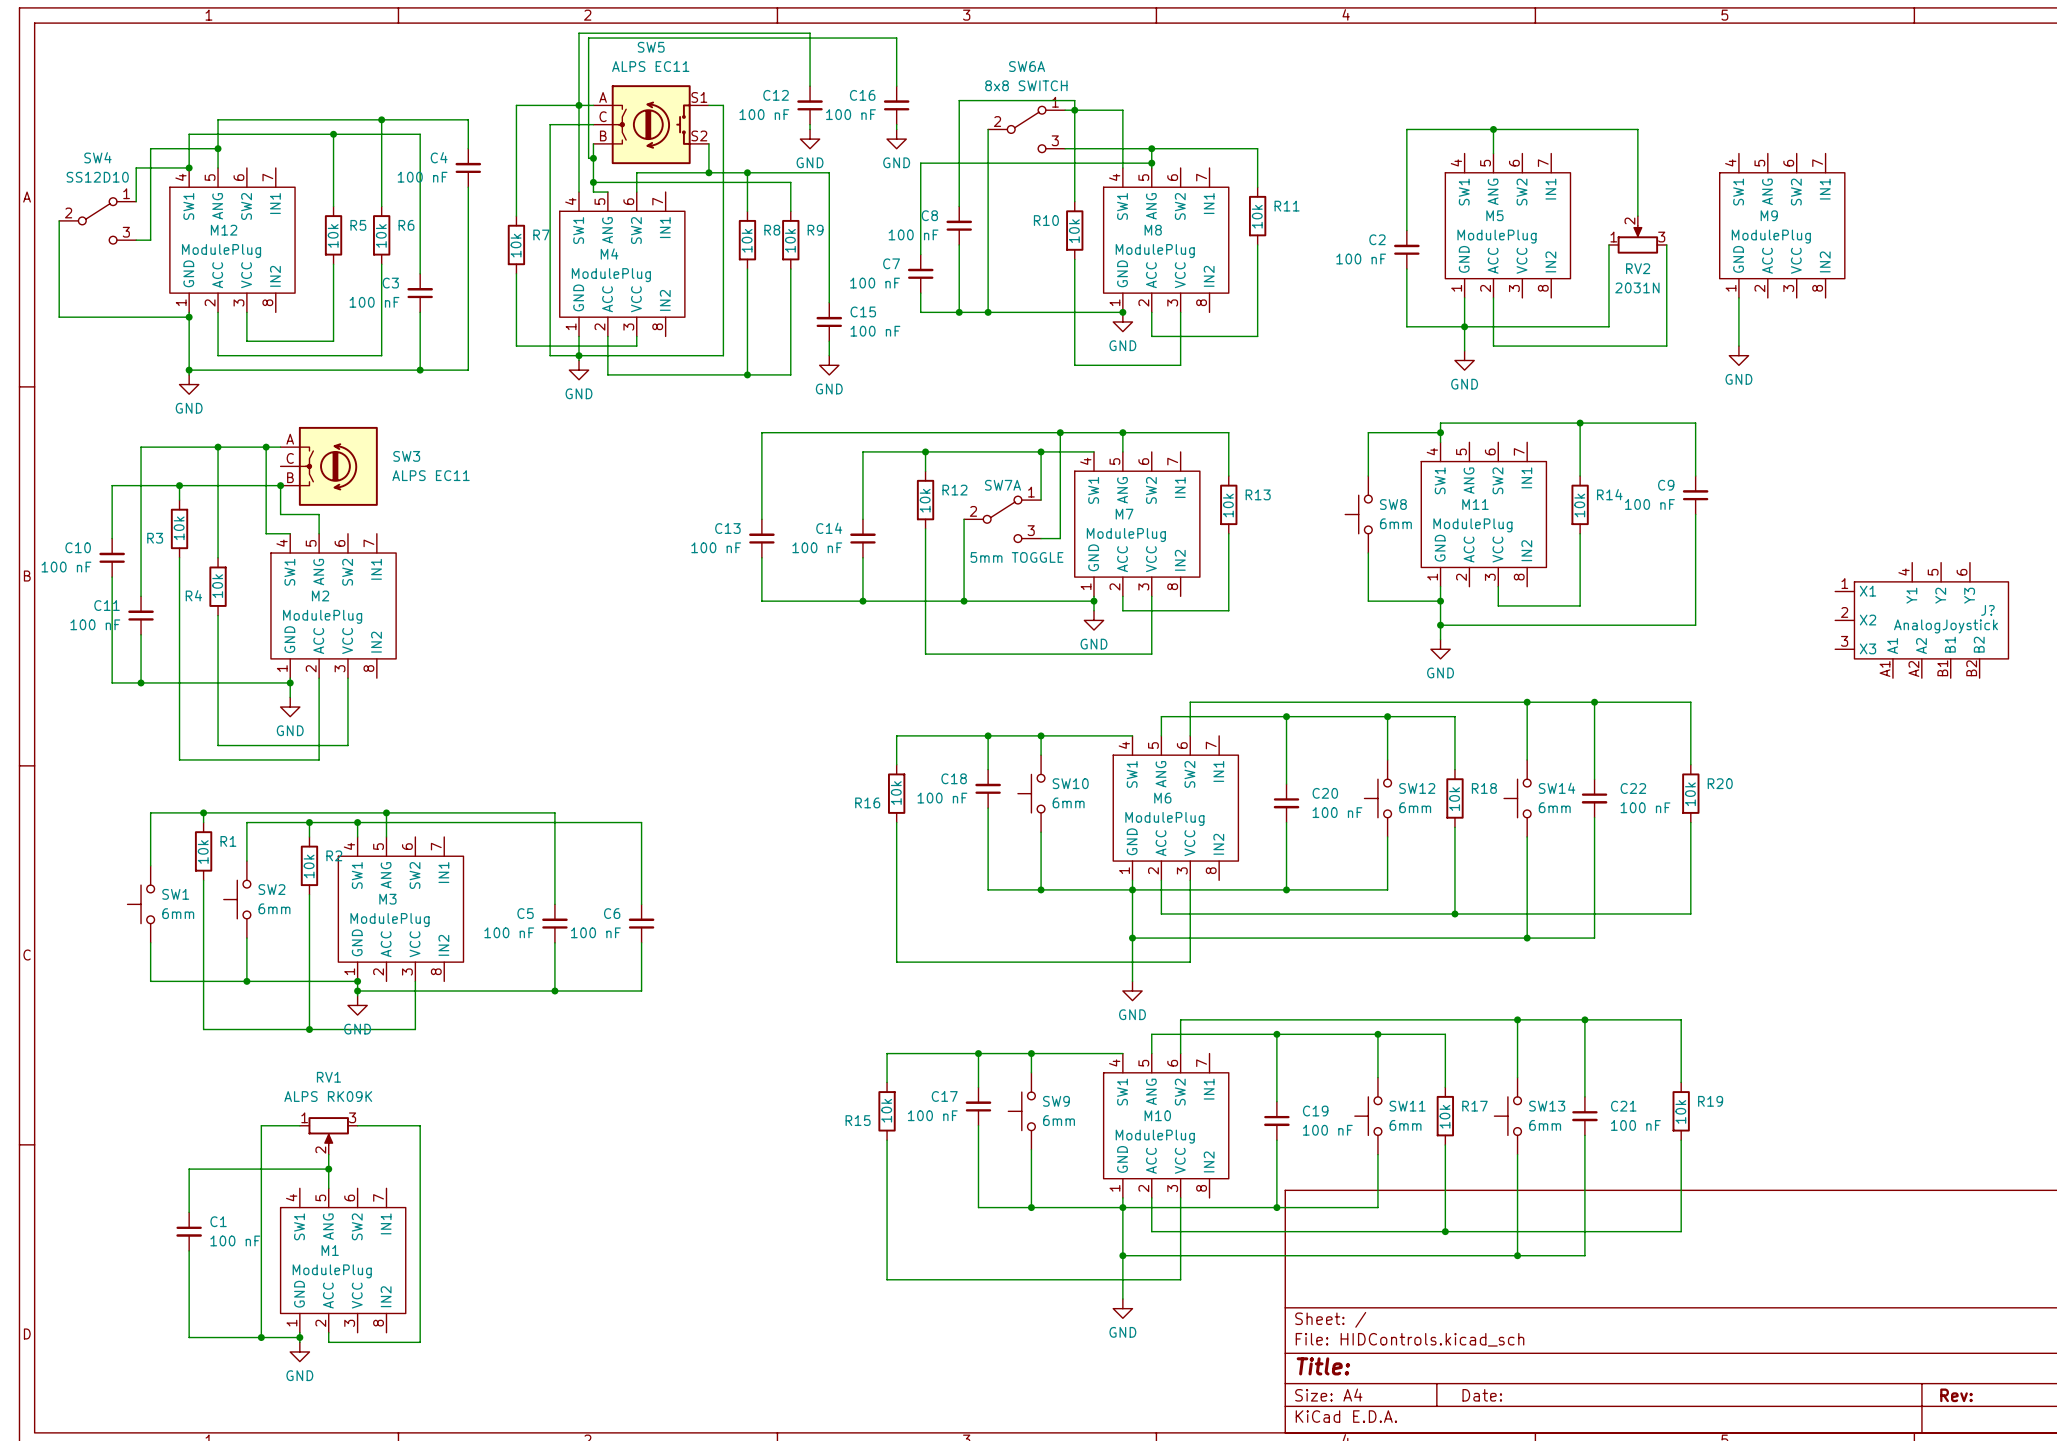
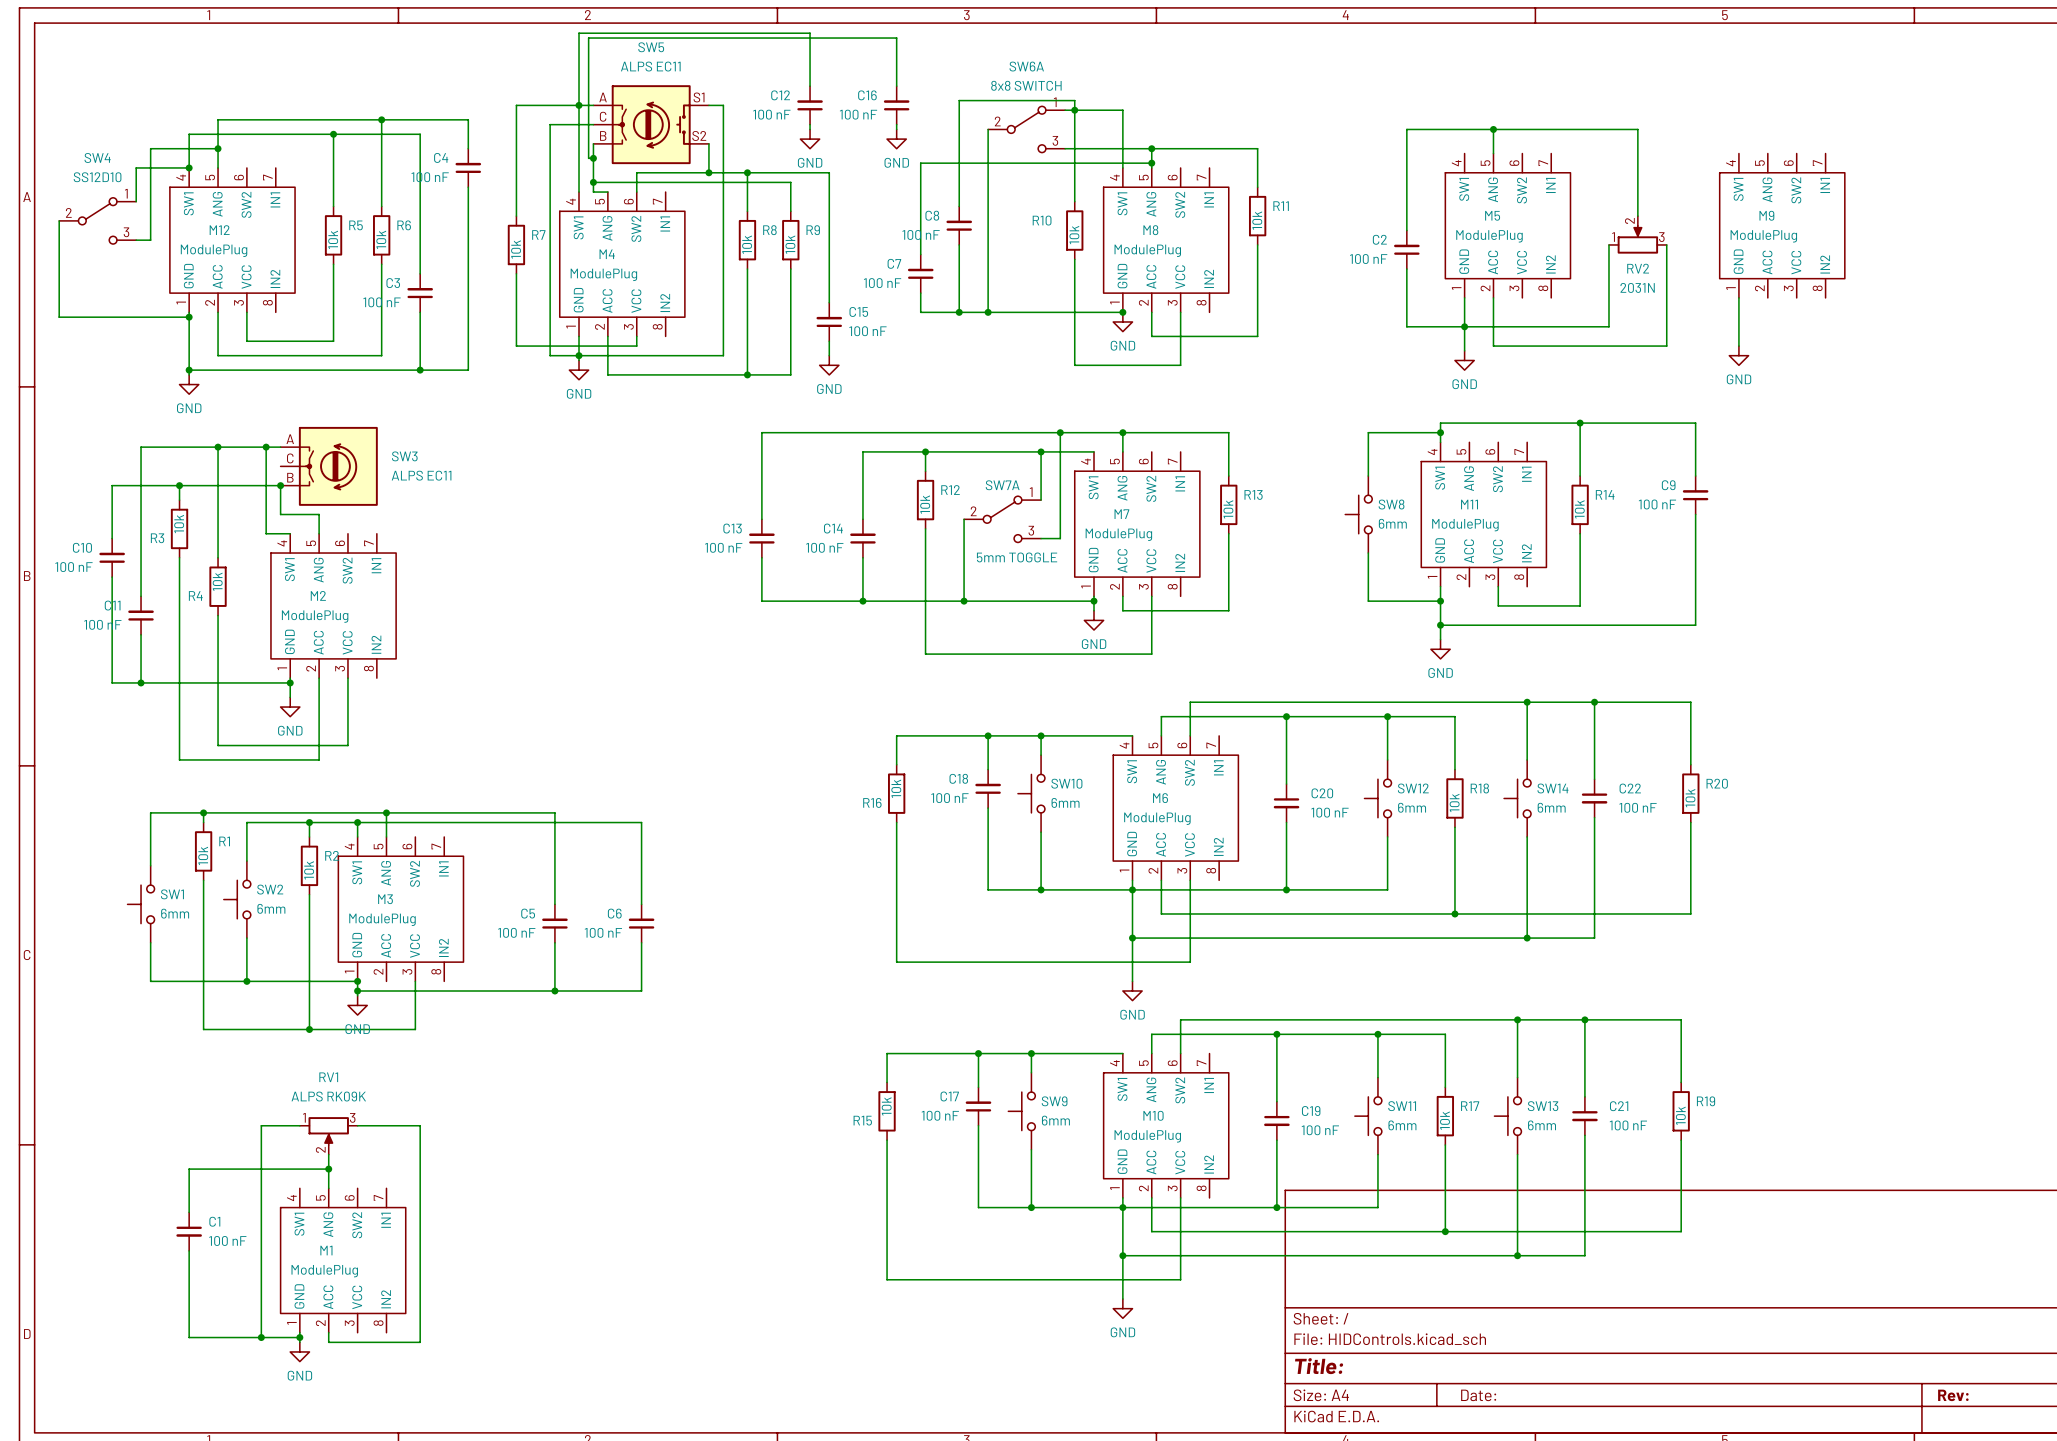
J?: AnalogJoystick (1921, 620) -> none

